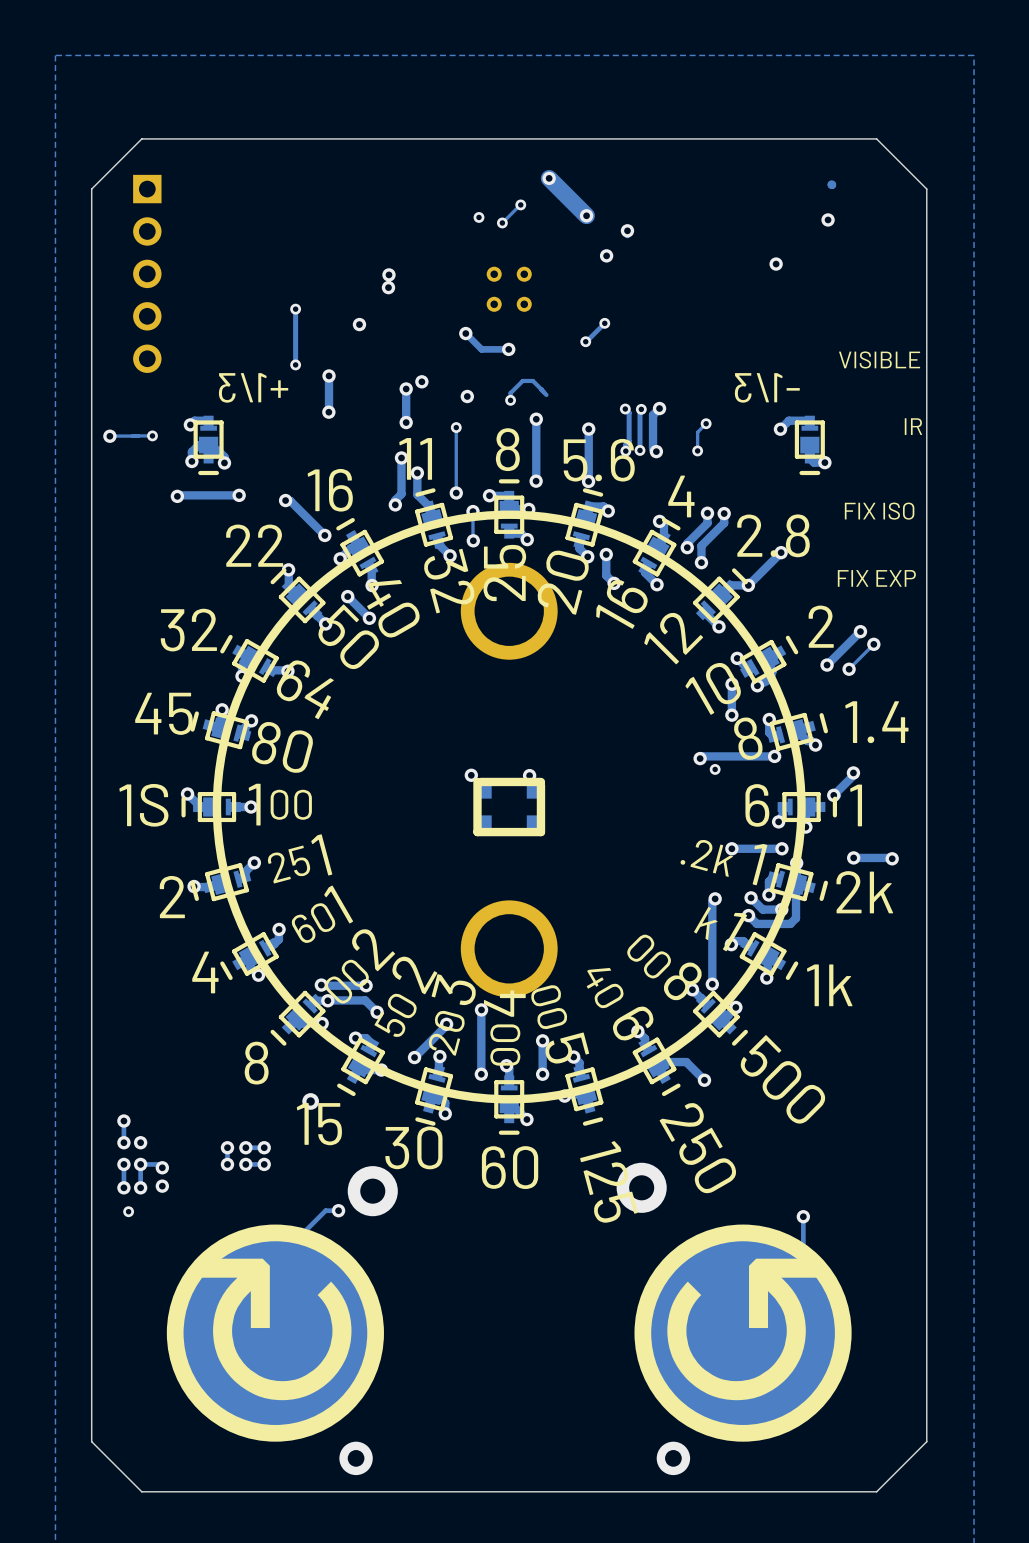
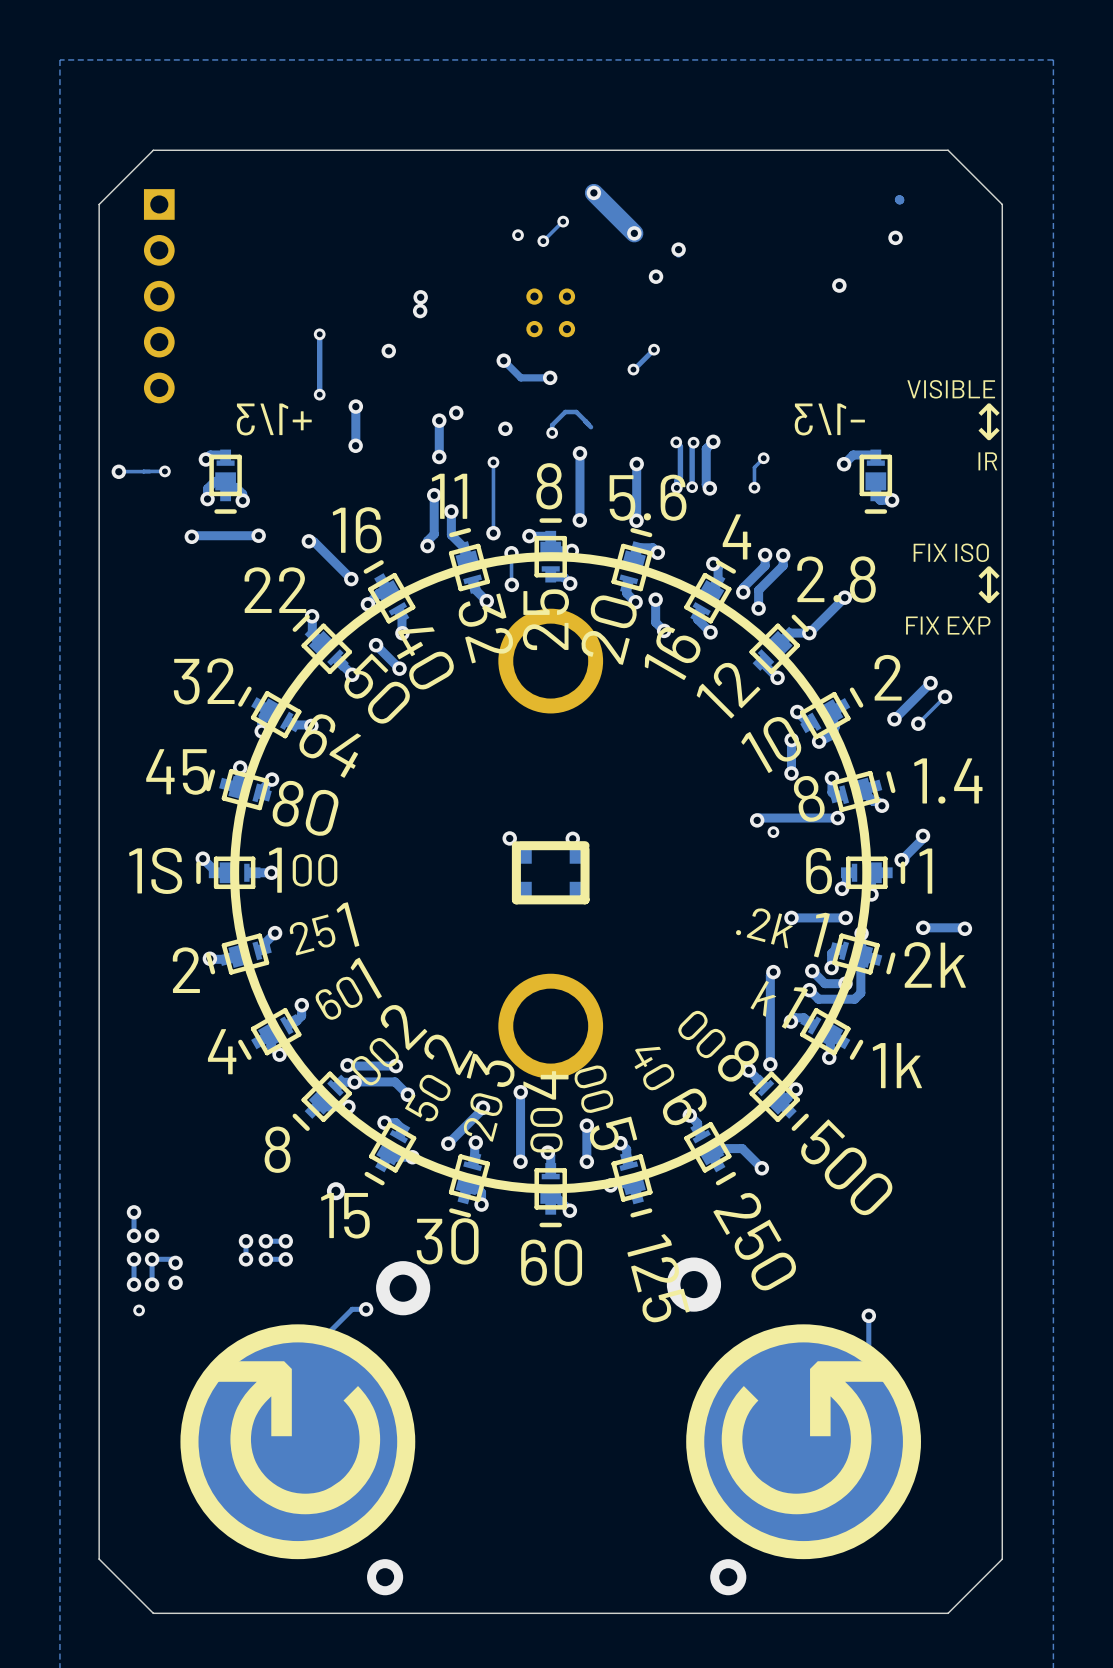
text: none -> ↕ (989, 421)
text: none -> ↕ (989, 584)

